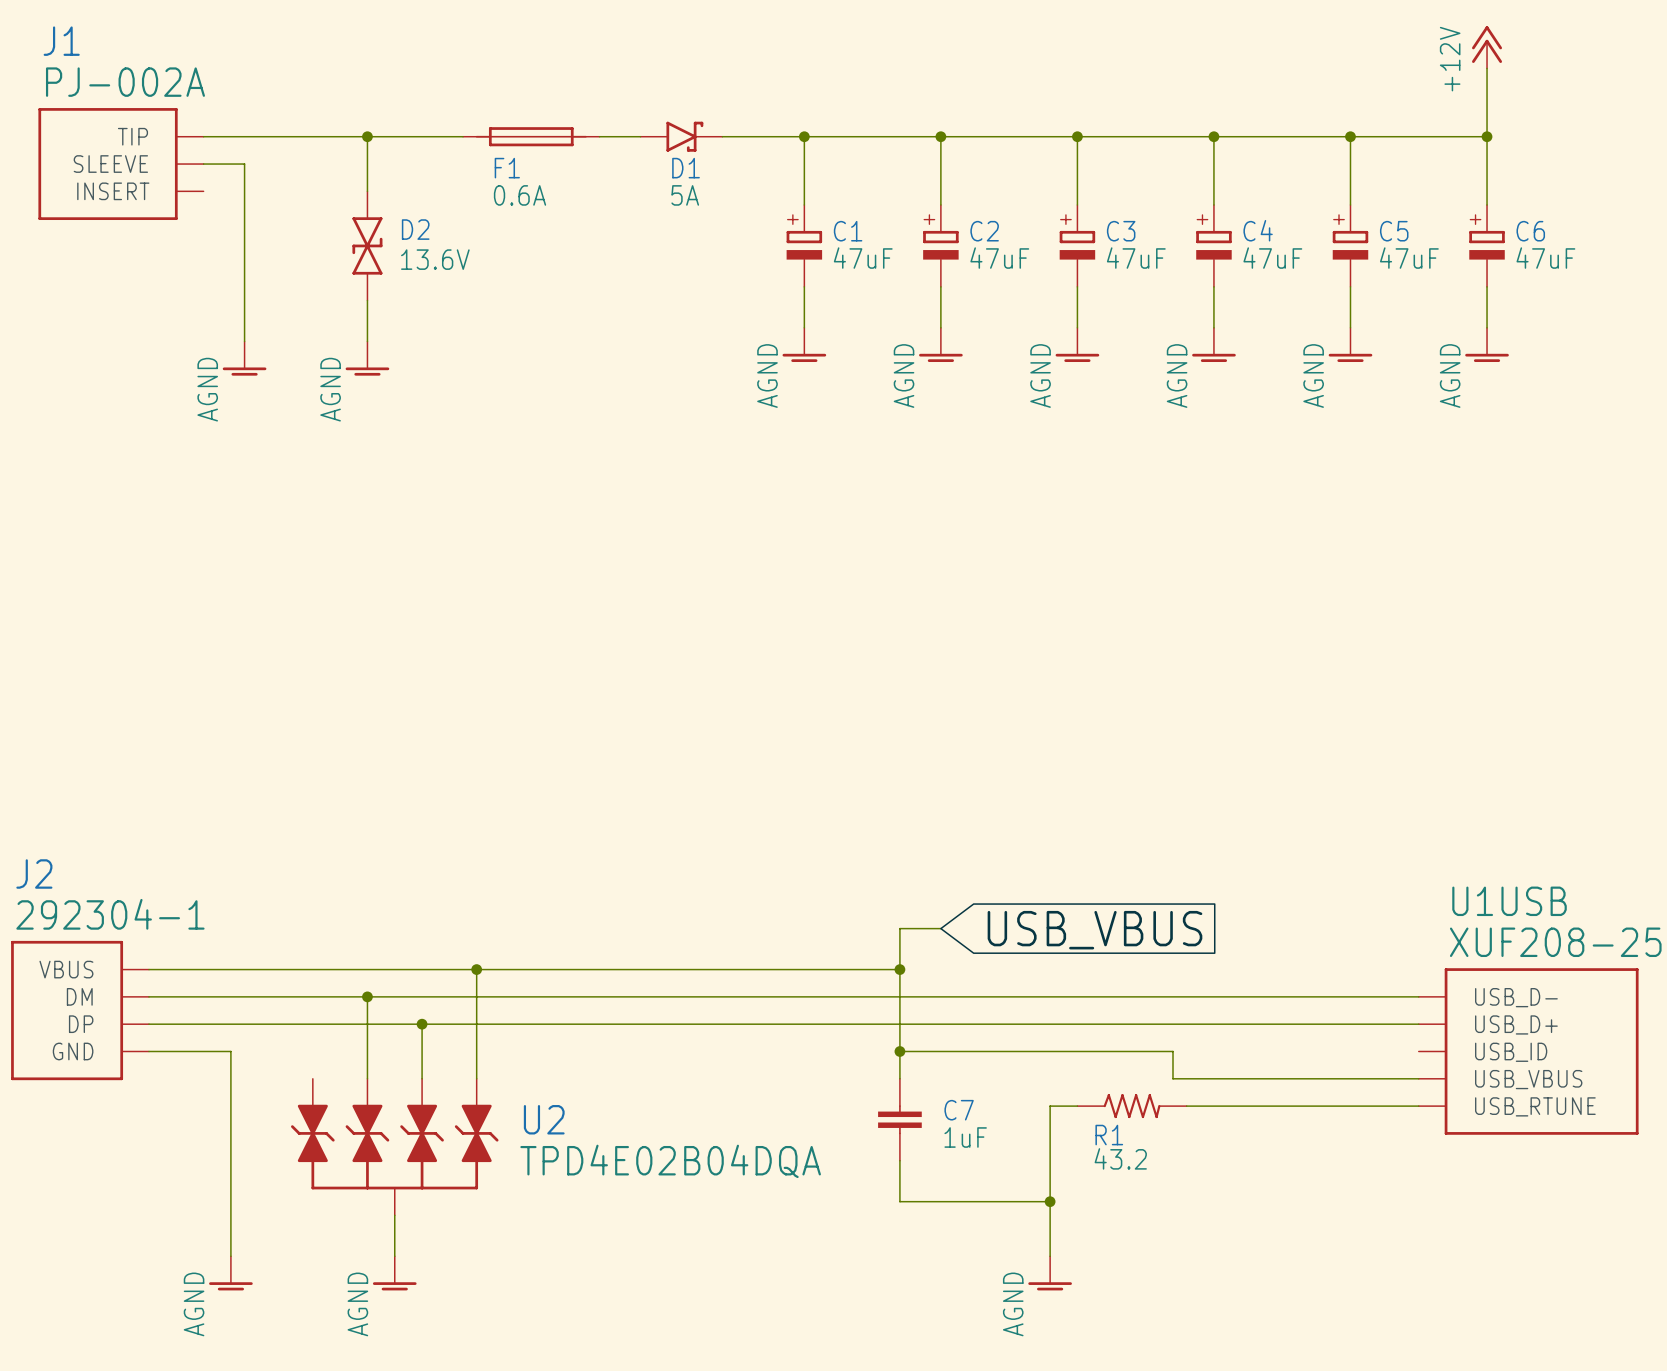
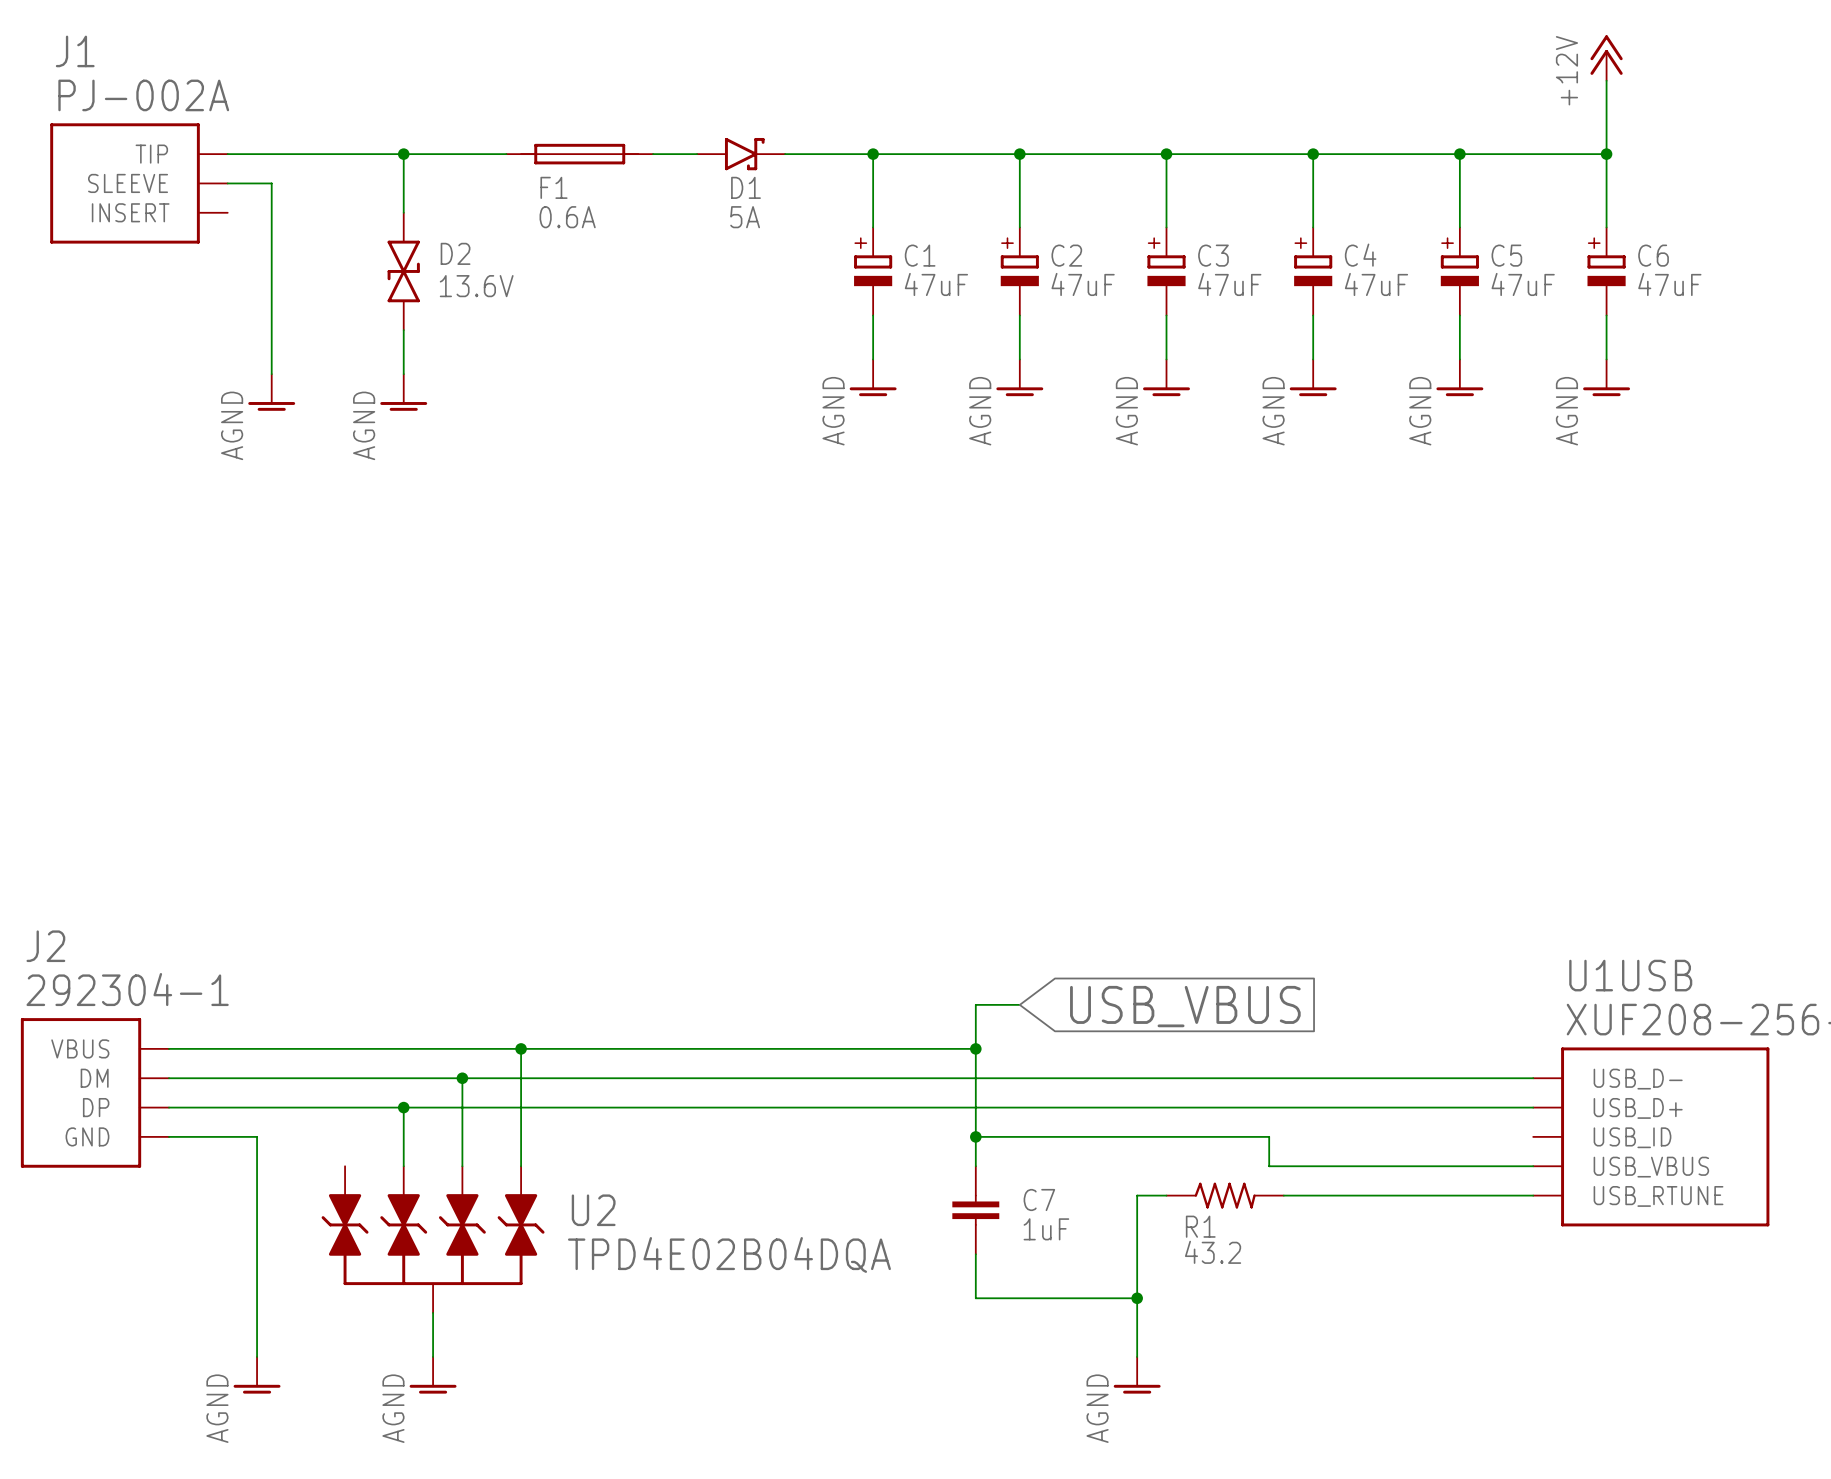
wire: (367, 996) (367, 1024) -> (462, 1078) (462, 1107)
junction: (367, 996) -> none
junction: none -> (462, 1078)
junction: none -> (403, 1107)
junction: (422, 1024) -> none

